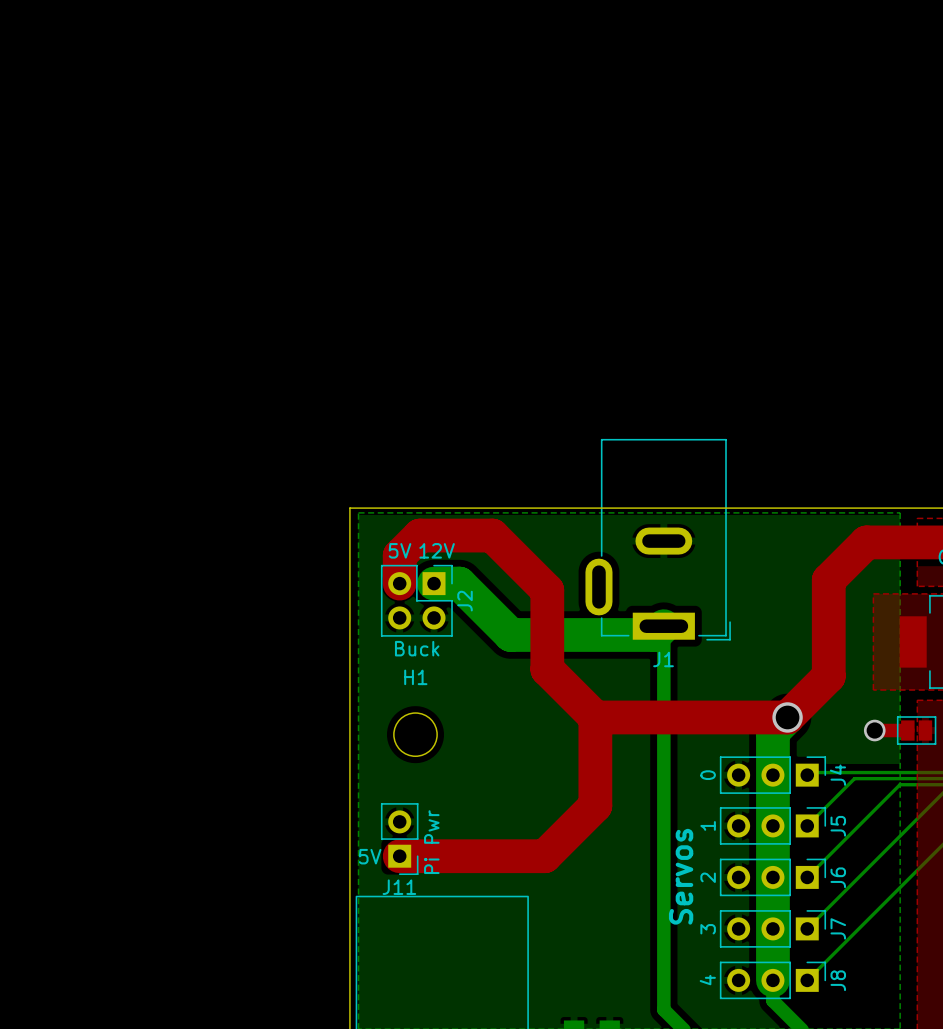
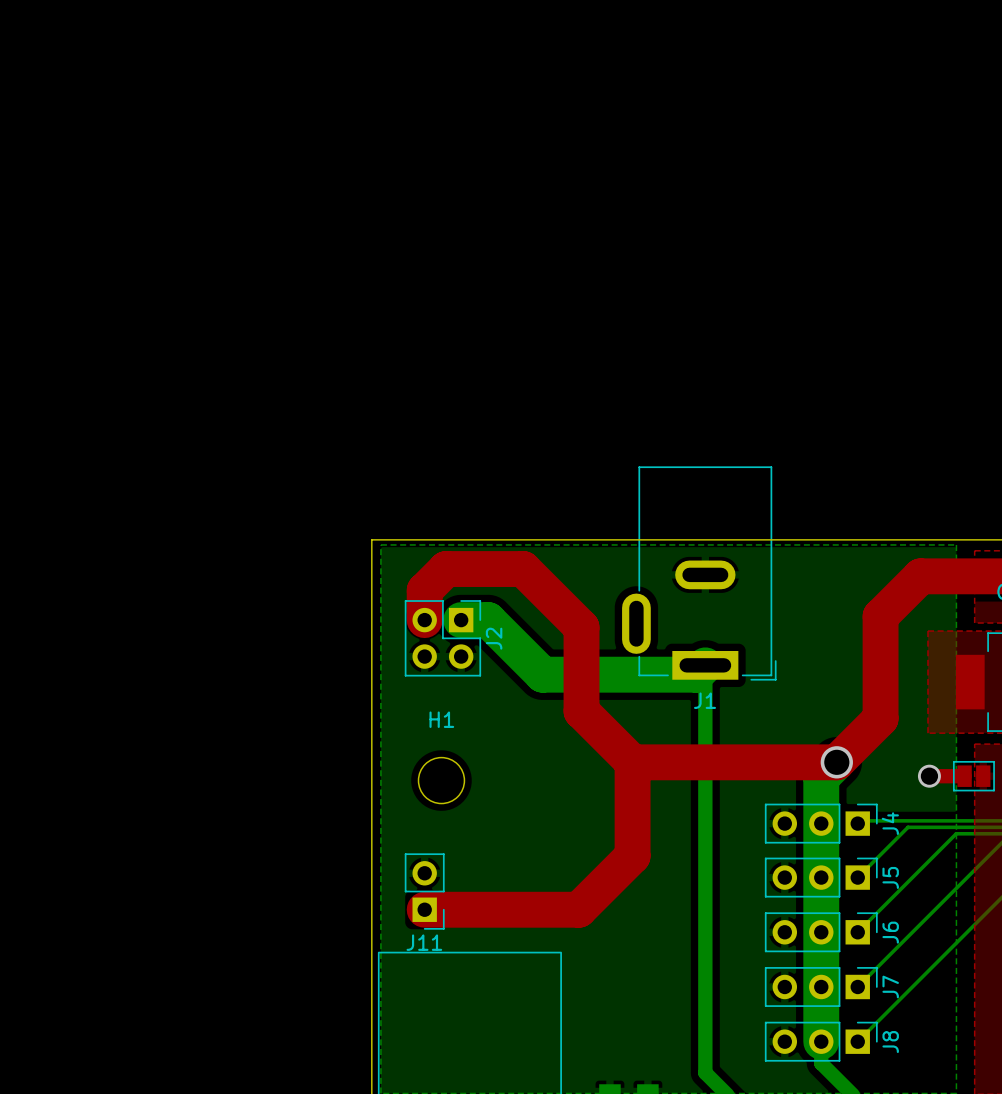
text: 5V (400, 550) -> none
text: 12V (437, 550) -> none
text: Buck (417, 648) -> none
text: 0 (708, 775) -> none
text: 1 (708, 825) -> none
text: Pi Pwr (431, 842) -> none
text: 5V (370, 856) -> none
text: Servos (681, 876) -> none
text: 2 (708, 877) -> none
text: 3 (708, 929) -> none
text: 4 (707, 980) -> none

